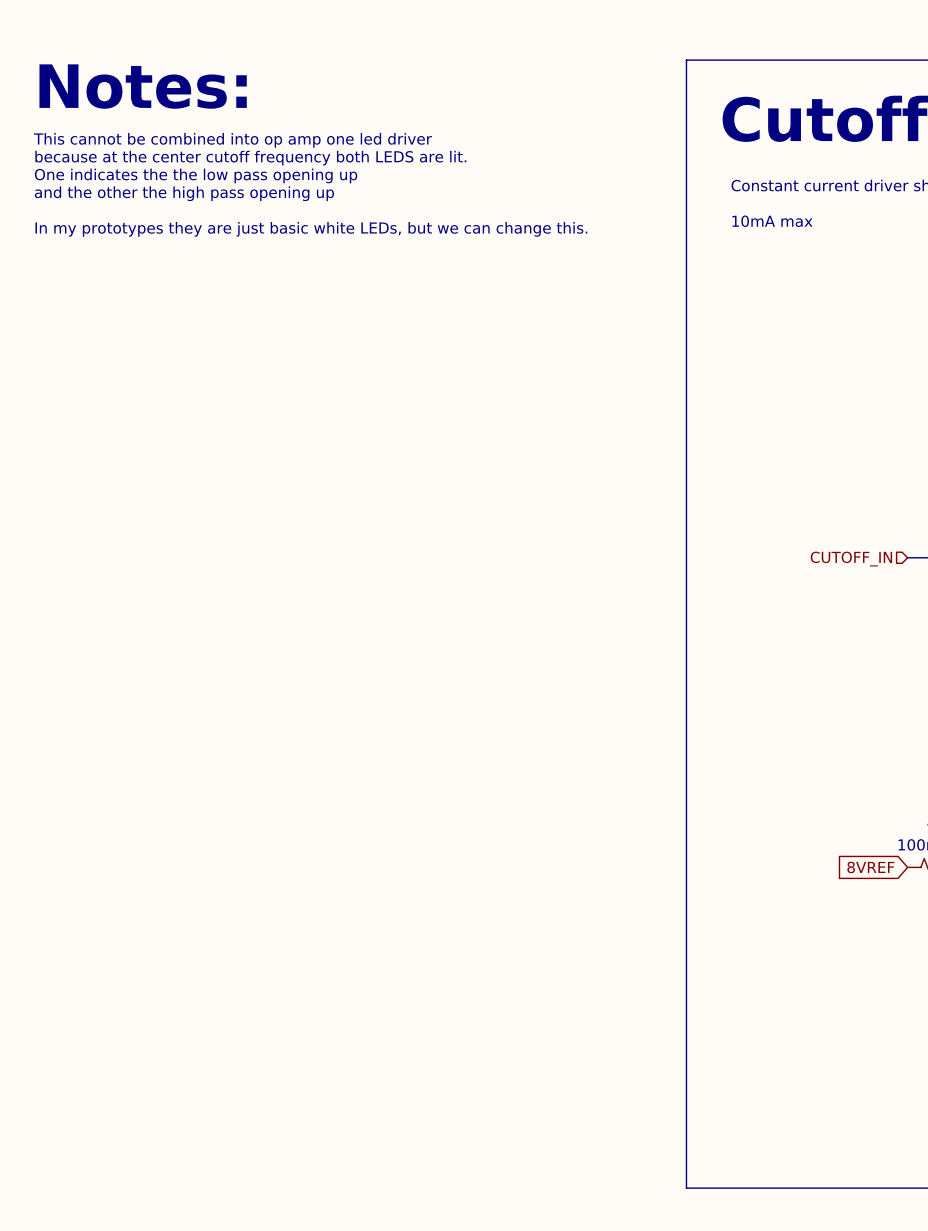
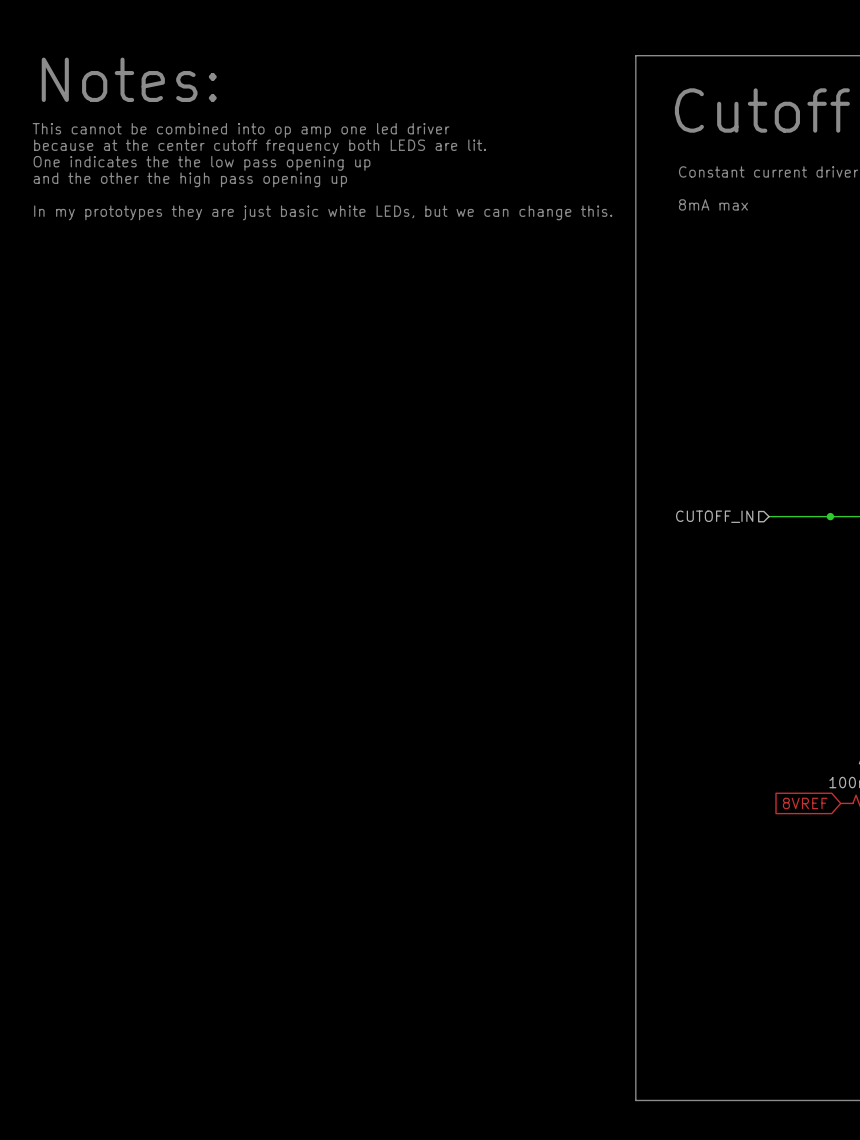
text: 10mA max (772, 221) -> 8mA max (713, 204)
wire: none -> (768, 516) (840, 516)
junction: none -> (830, 516)
hierarchical label position: CUTOFF_IN (851, 559) -> CUTOFF_IN (714, 516)

